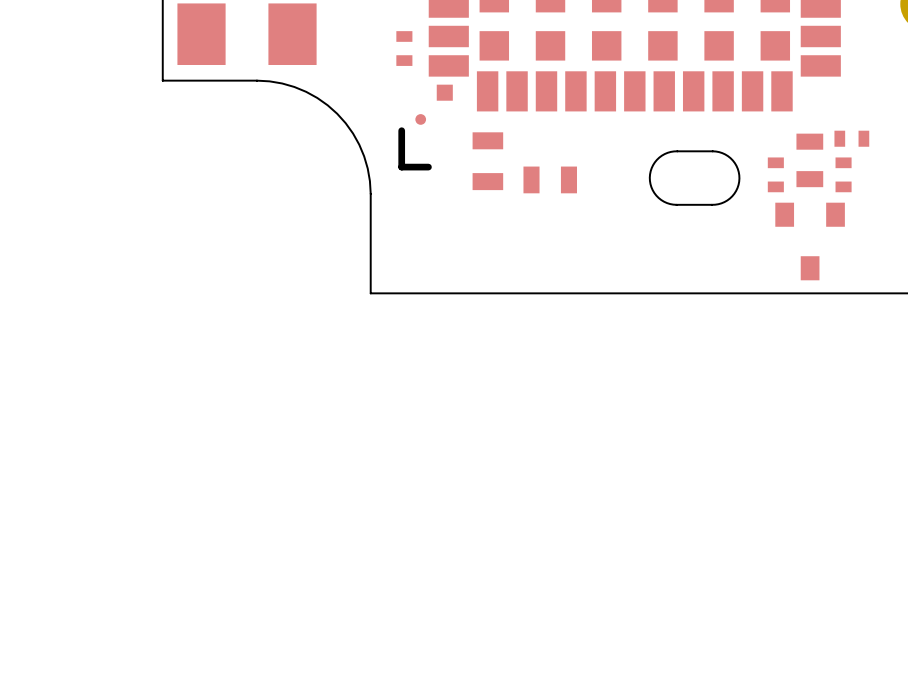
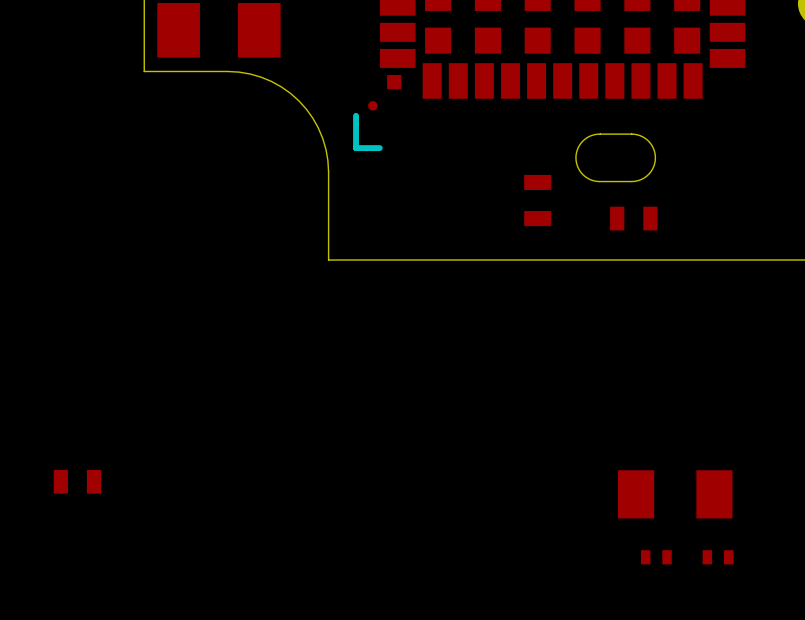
part: (404, 48) -> none
part: (851, 138) -> none
part: (809, 160) -> none
part position: (487, 161) -> (537, 200)
part: (775, 174) -> none
part: (843, 174) -> none
part: (550, 179) -> none
part: (810, 241) -> none
part: none -> (633, 218)
part: none -> (77, 481)
part: none -> (675, 494)
part: none -> (656, 557)
part: none -> (718, 557)

